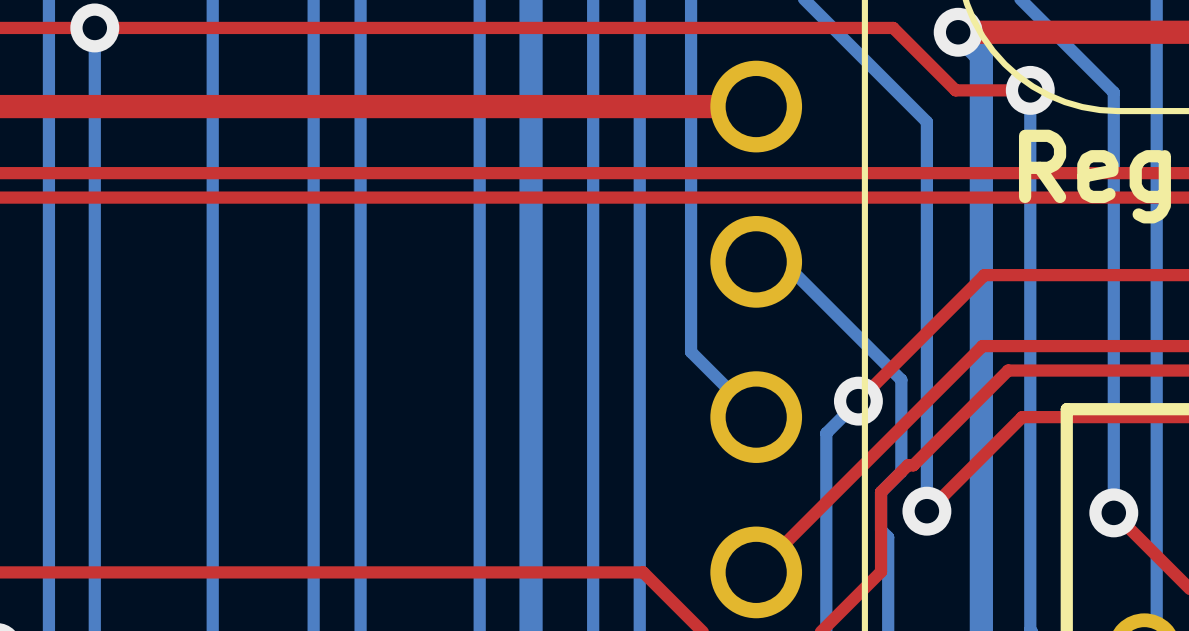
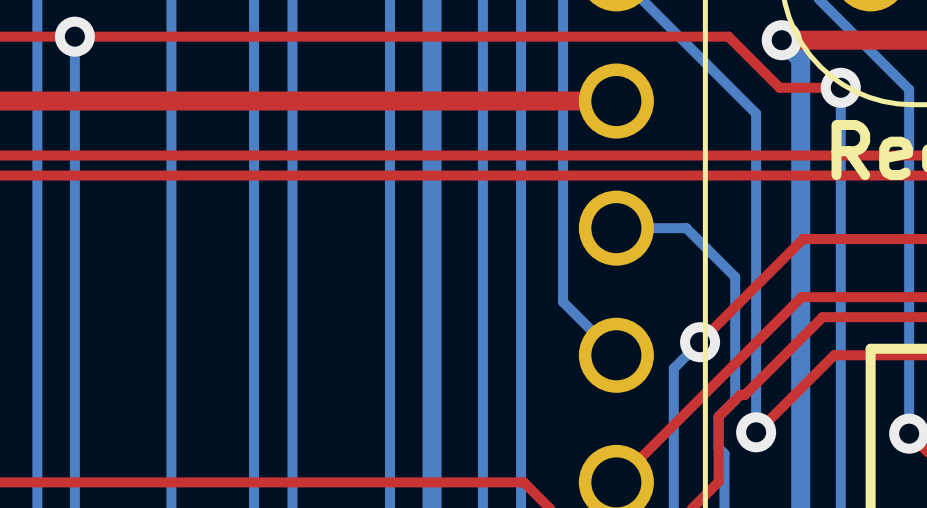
bottom track: (783, 261) (901, 379) -> (616, 228) (686, 228) (735, 277) (735, 324)

